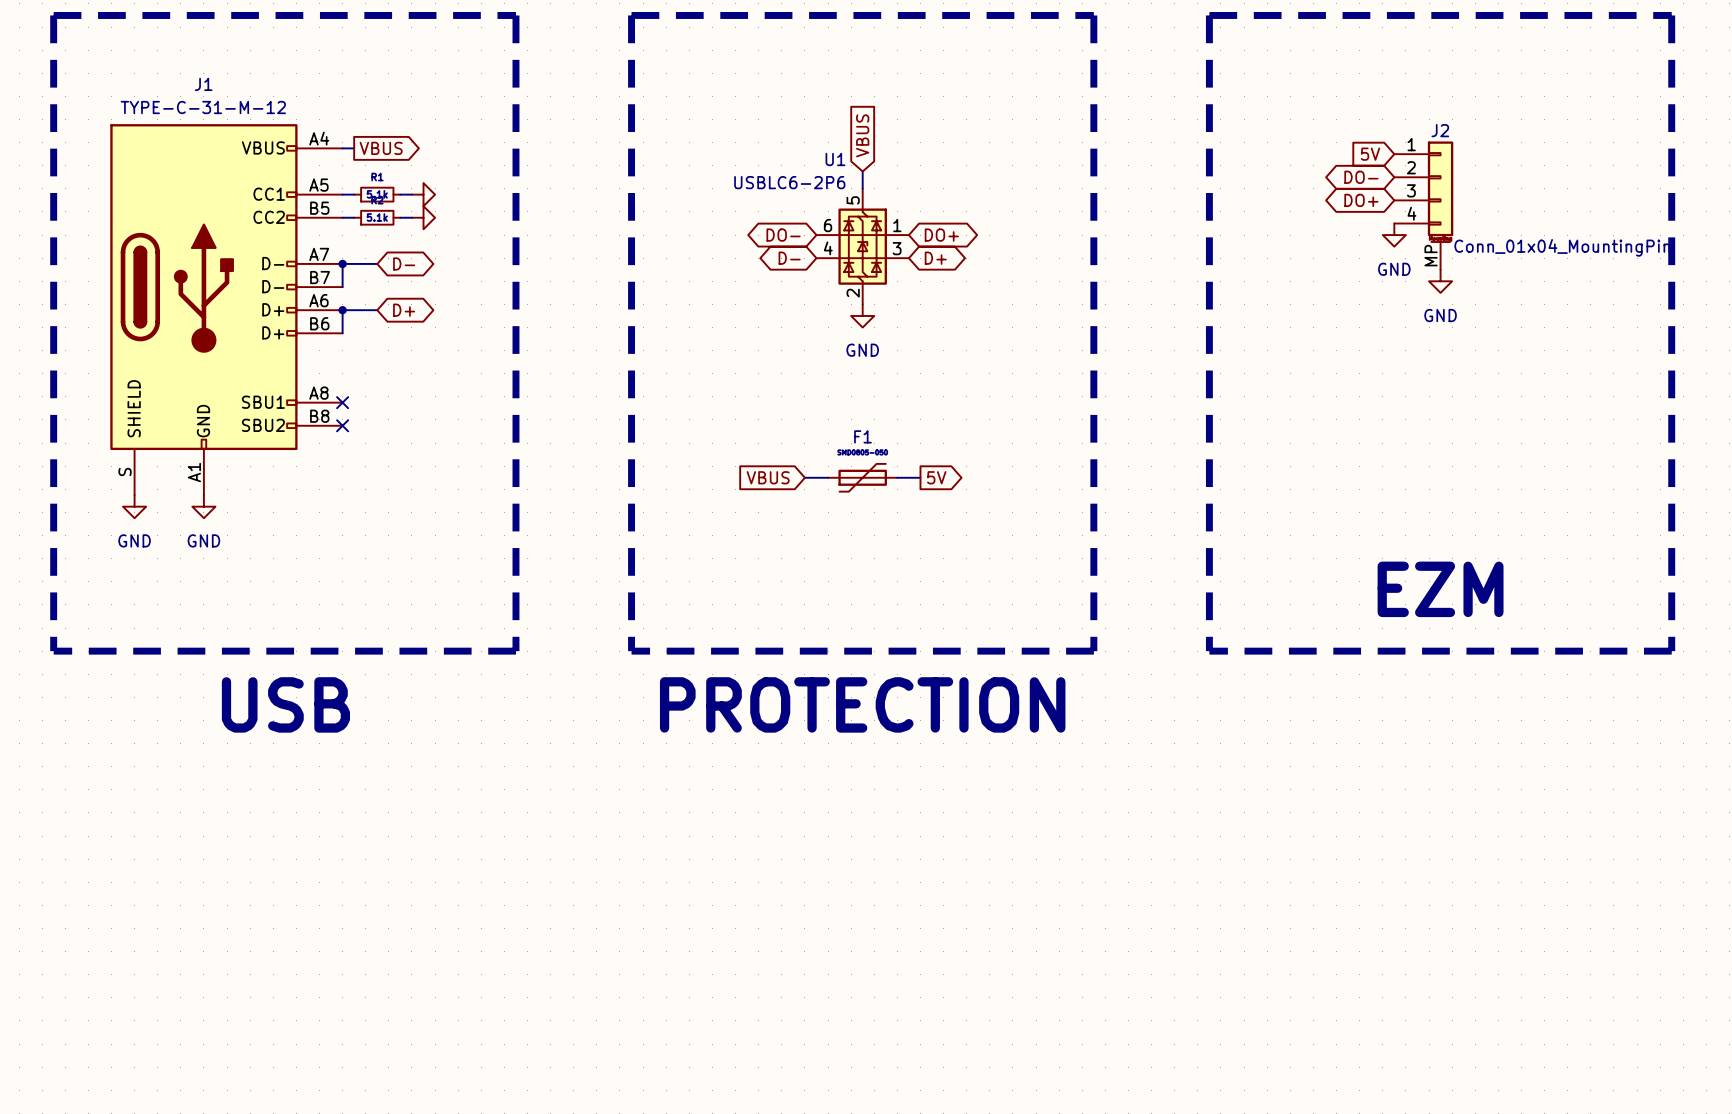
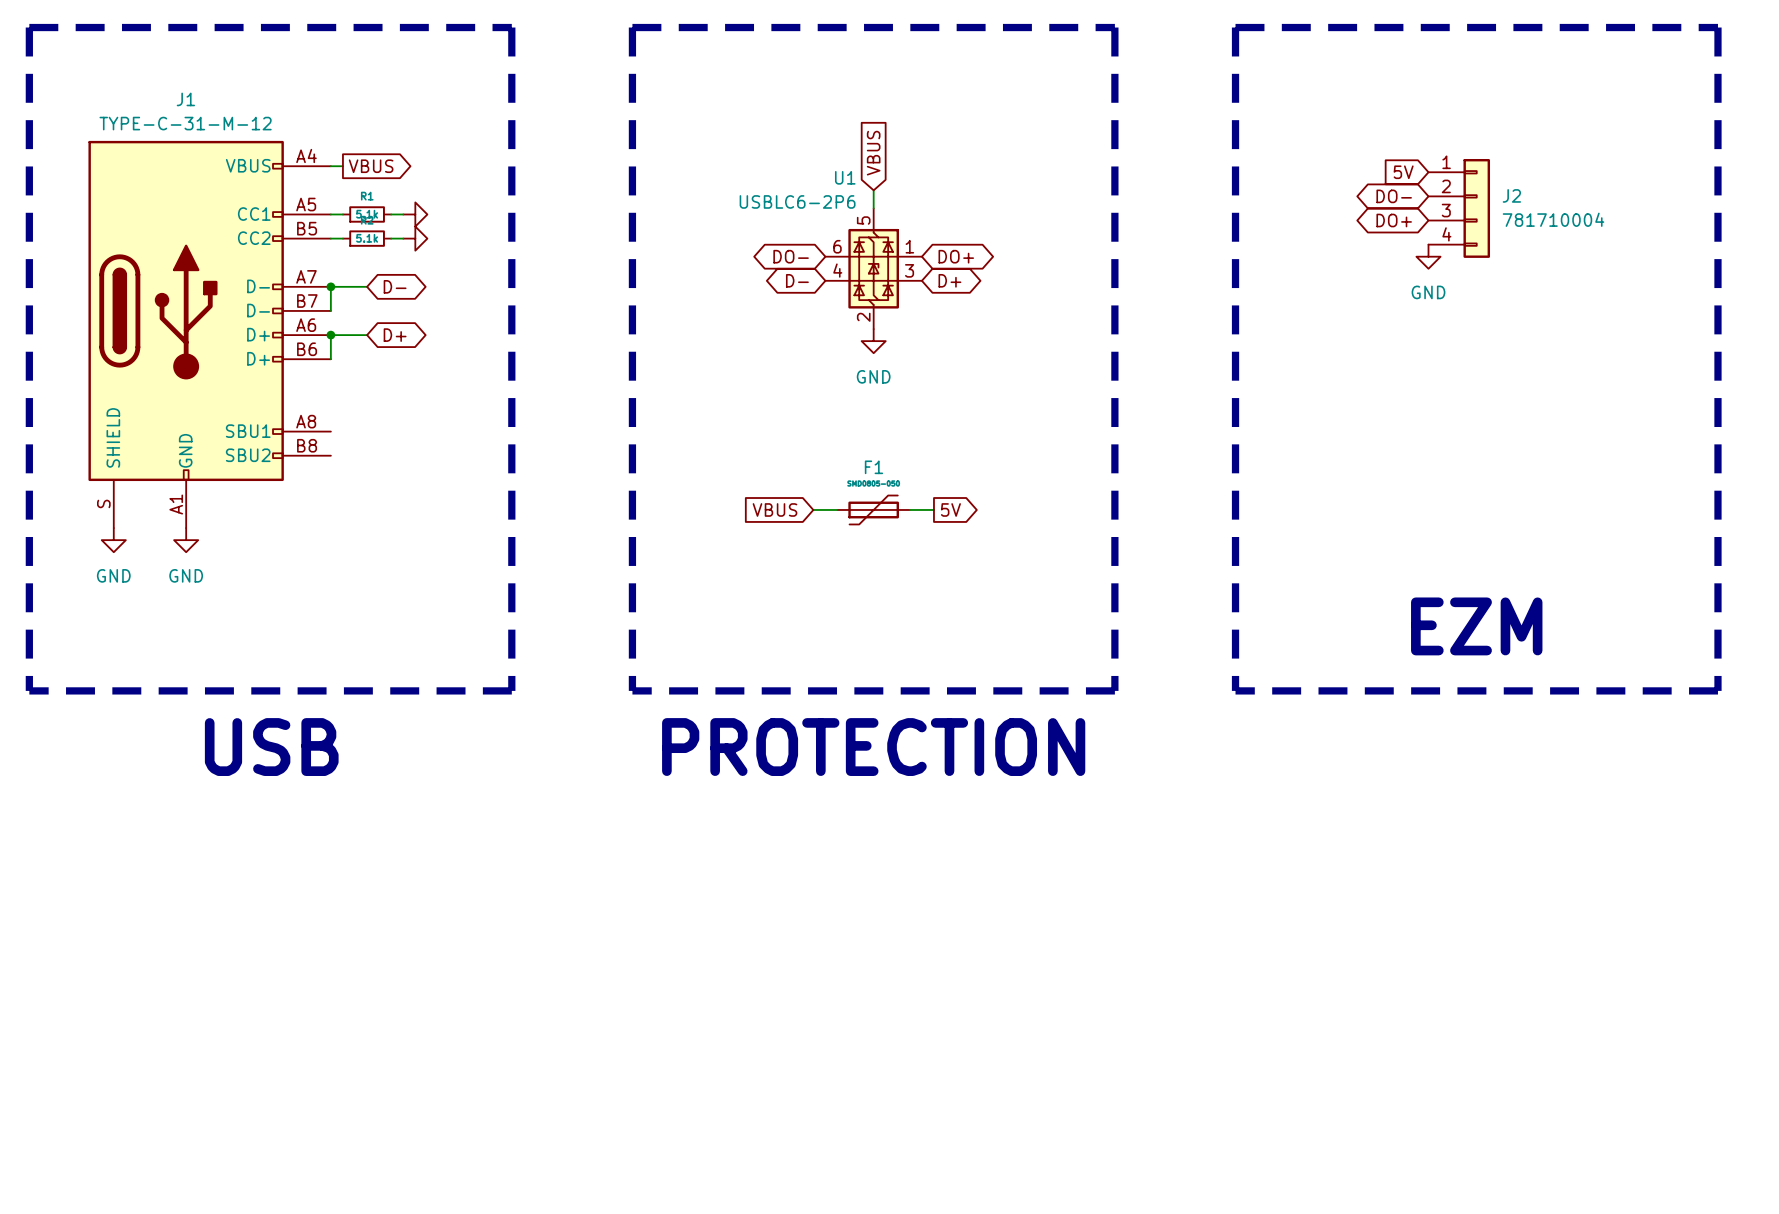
J2 name position: J2 (1440, 130) -> J2 (1511, 195)
J2 symbol: [1394, 141, 1454, 270] -> [1428, 158, 1491, 258]
J2 value: Conn_01x04_MountingPin (1562, 247) -> 781710004 (1553, 219)
power symbol: GND (1440, 281) -> none
no-connect mark: (342, 402) -> none
no-connect mark: (342, 425) -> none

